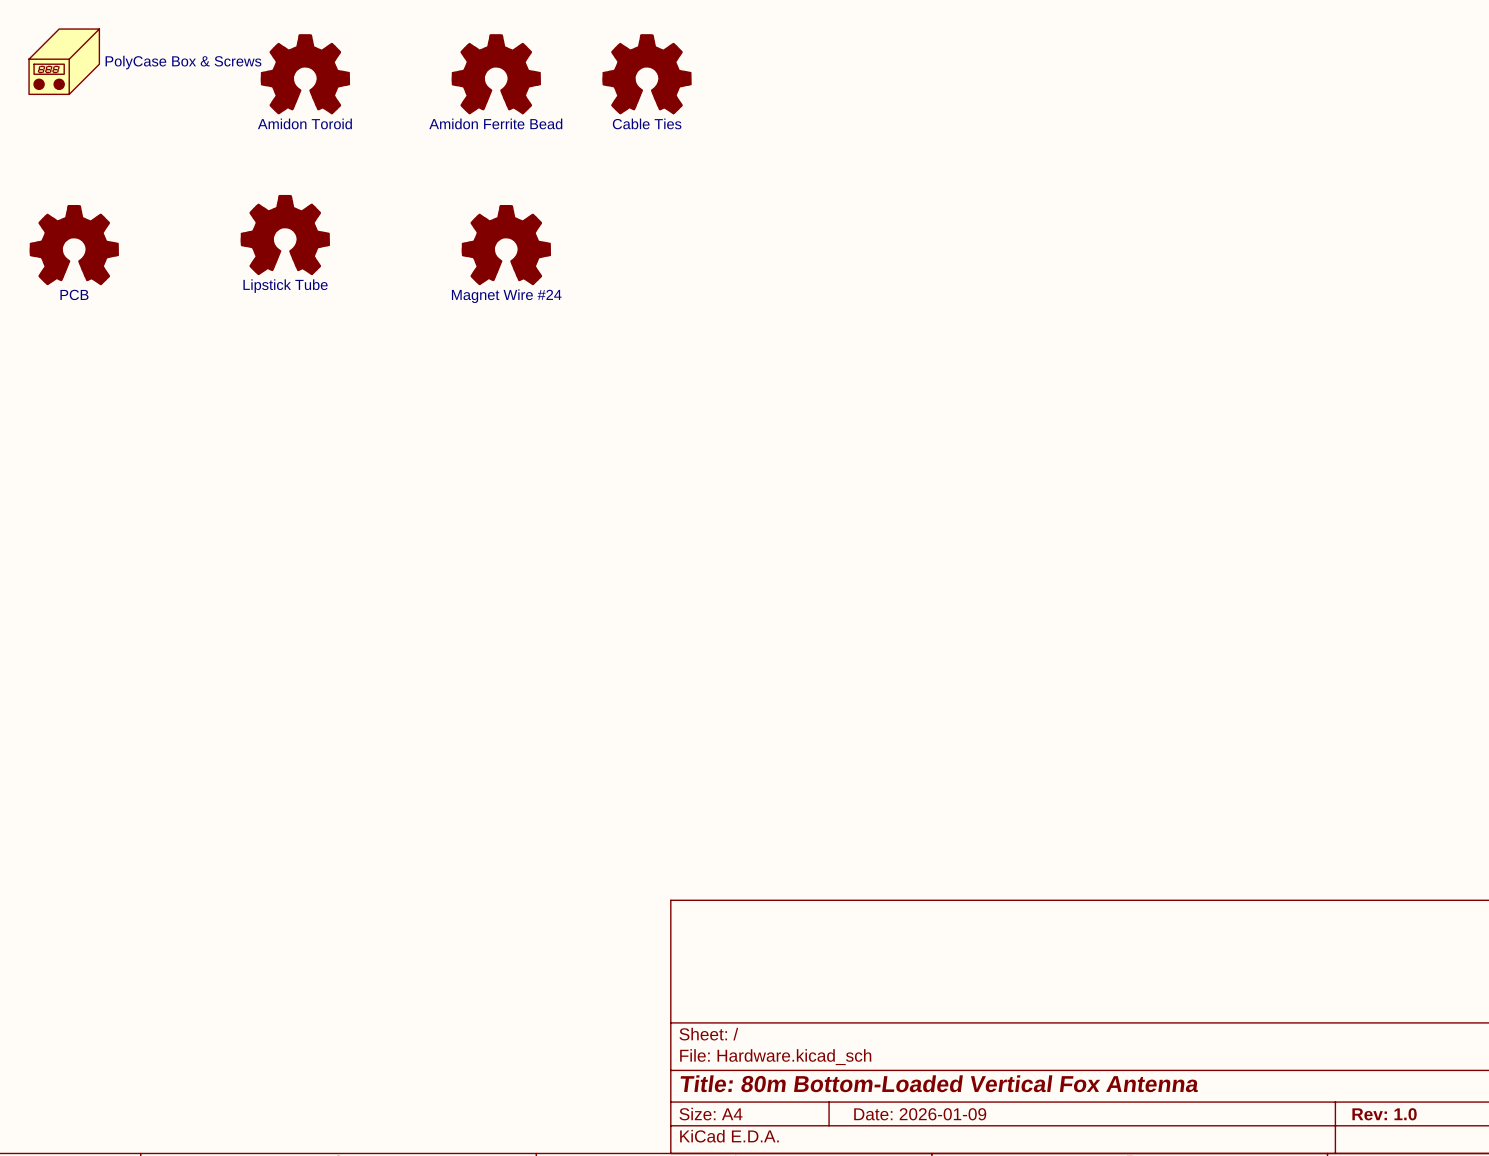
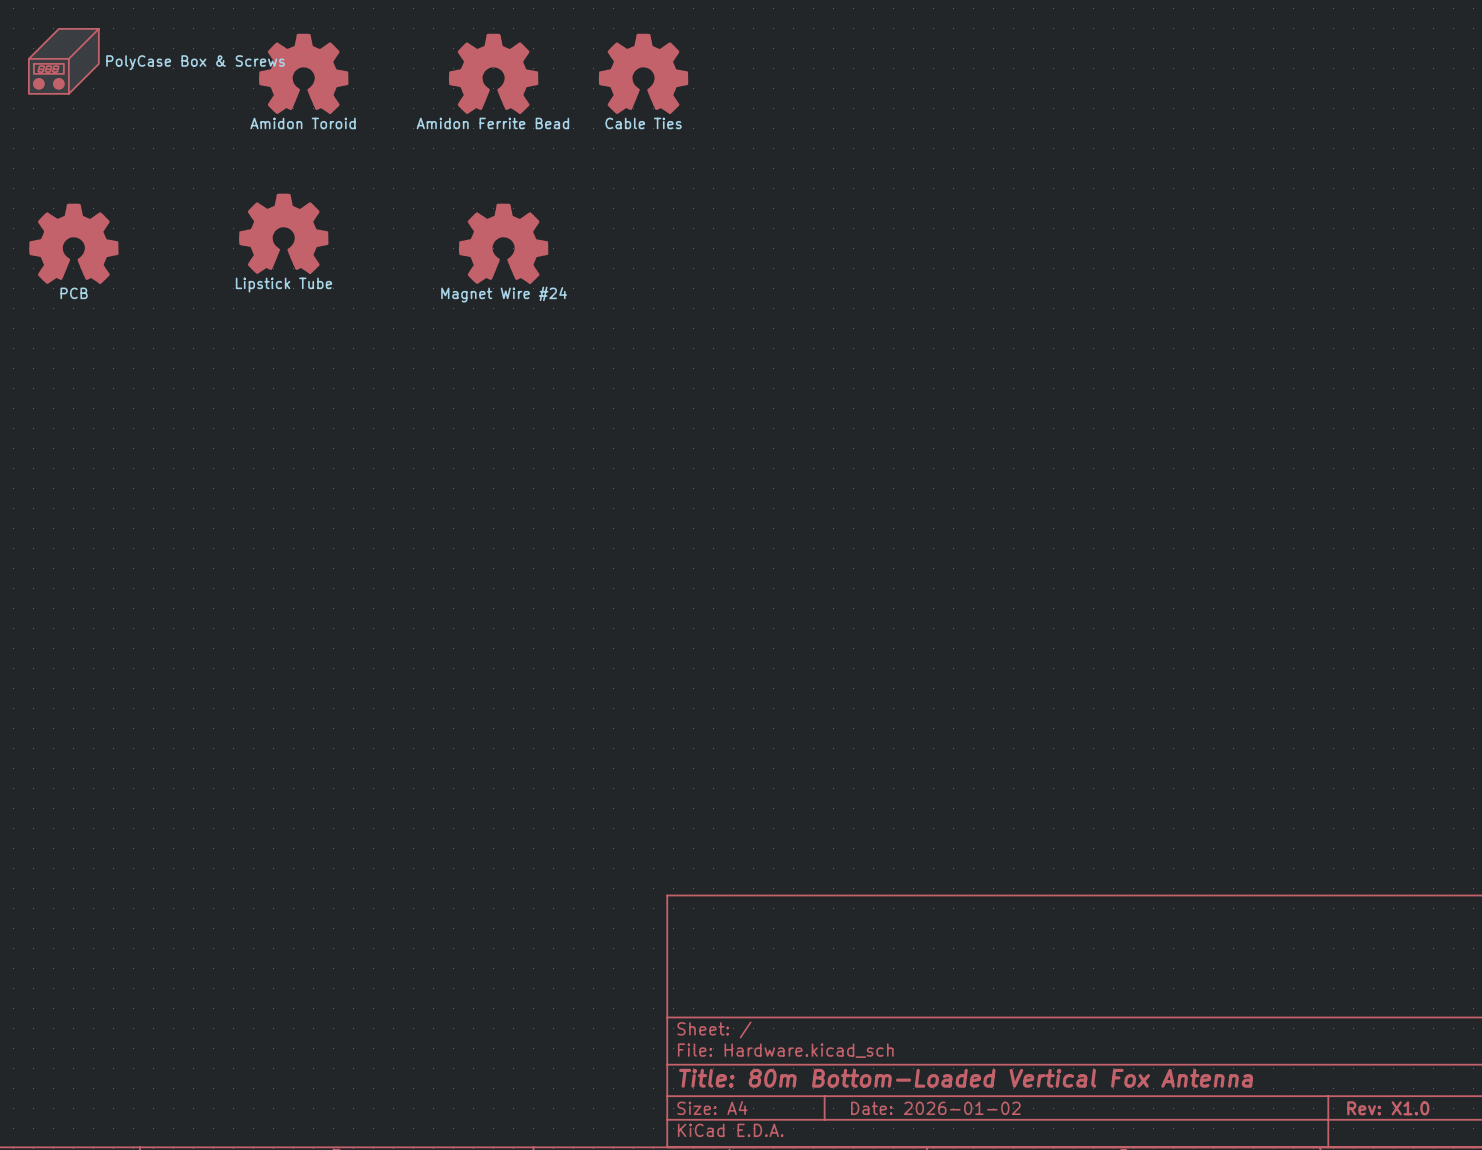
title block: Date: 2026-01-09 (920, 1114) -> Date: 2026-01-02 (935, 1108)
title block: Rev: 1.0 (1384, 1114) -> Rev: X1.0 (1388, 1108)

